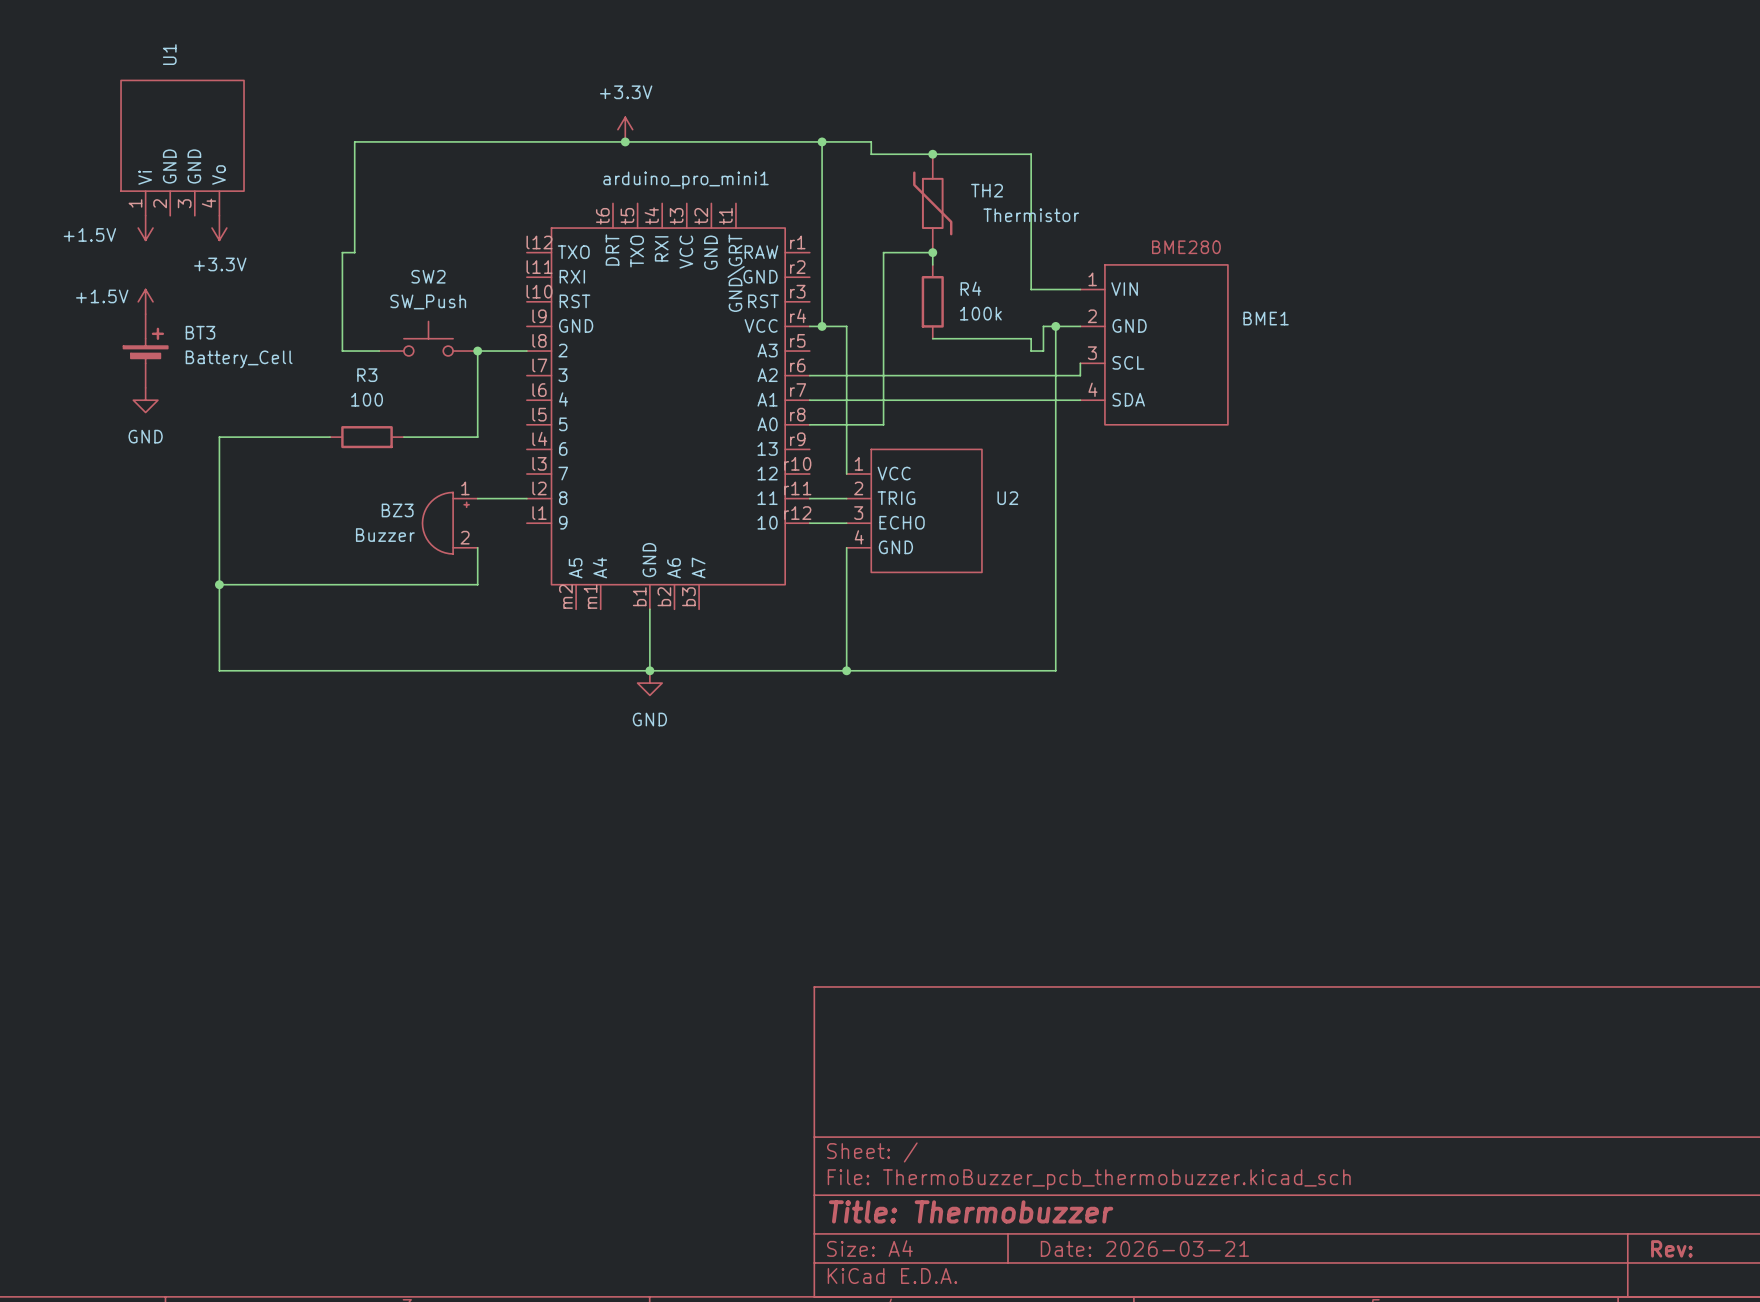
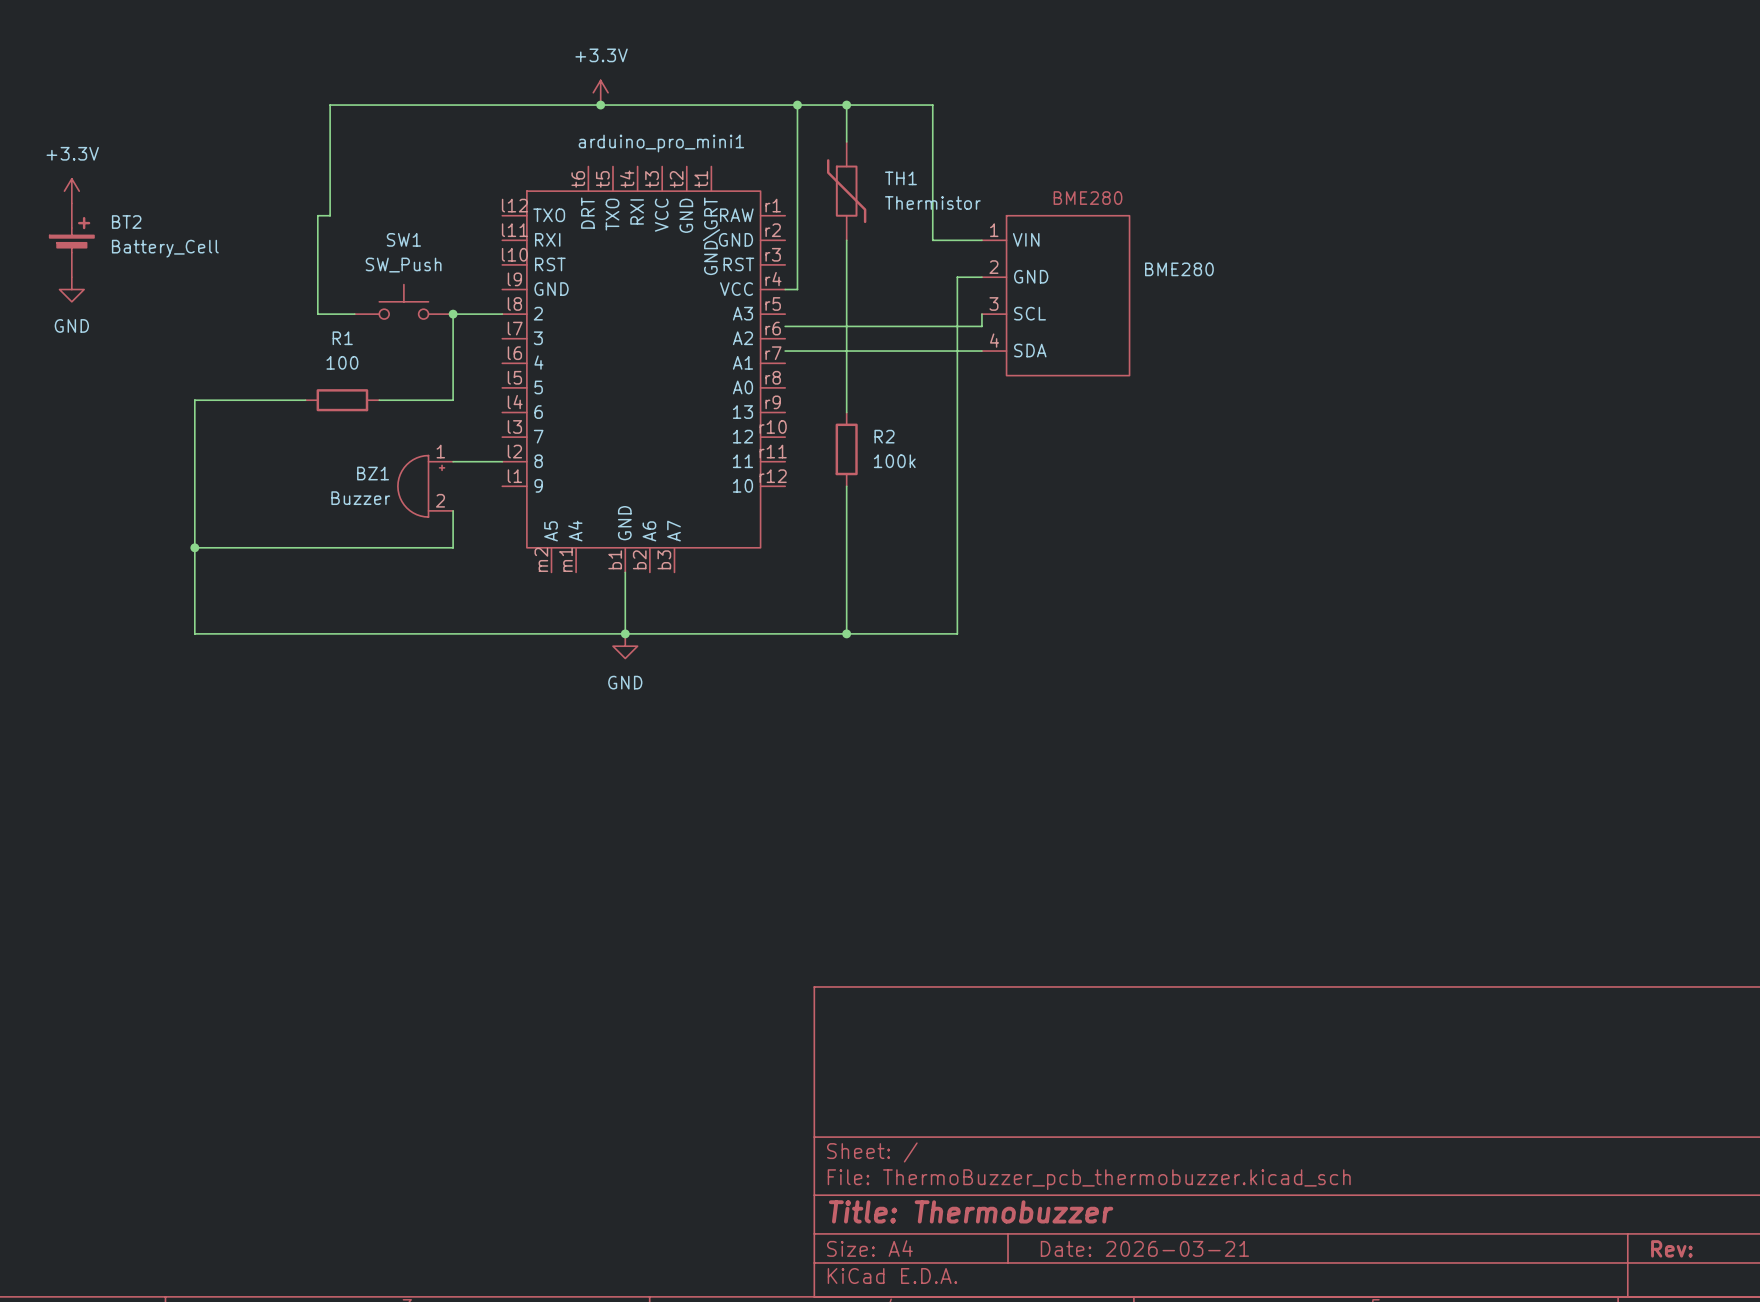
wire: none -> (797, 105) (797, 289) (785, 289)
junction: none -> (797, 105)
wire: none -> (846, 105) (846, 141)
junction: none -> (846, 105)
power symbol position: +3.3V (625, 129) -> +3.3V (600, 92)
junction position: (625, 141) -> (600, 105)
wire: (822, 141) (822, 326) -> none
junction: (822, 141) -> none
U1: (182, 148) -> none
junction: (932, 154) -> none
TH1: none -> Thermistor (846, 191)
TH2: Thermistor (932, 203) -> none
power symbol: +1.5V (145, 228) -> none
power symbol rotation: 0° (219, 228) -> 180° (71, 191)
power symbol position: +3.3V (219, 228) -> +3.3V (71, 191)
BT2: none -> Battery_Cell (71, 240)
wire: none -> (846, 240) (846, 326) (981, 326) (981, 314)
wire: none -> (981, 240) (932, 240) (932, 105) (330, 105) (330, 215) (317, 215) (317, 314) (354, 314)
junction: (932, 252) -> none
wire: (932, 264) (932, 252) (883, 252) (883, 424) (809, 424) -> none
wire: none -> (981, 277) (957, 277) (957, 633) (194, 633) (194, 400) (305, 400)
wire: (1080, 289) (1031, 289) (1031, 154) (871, 154) (871, 141) (354, 141) (354, 252) (342, 252) (342, 351) (379, 351) -> none
BME280: none -> (1055, 295)
power symbol: +1.5V (145, 301) -> none
SW1: none -> SW_Push (403, 301)
R4: 100k (932, 301) -> none
junction: (822, 326) -> none
wire: (1055, 326) (1055, 670) (219, 670) (219, 437) (330, 437) -> none
junction: (1055, 326) -> none
wire: (1080, 326) (1043, 326) (1043, 351) (1031, 351) (1031, 338) (932, 338) -> none
SW2: SW_Push (428, 338) -> none
BME1: (1154, 344) -> none
BT3: Battery_Cell (145, 351) -> none
junction position: (477, 351) -> (453, 314)
wire: (526, 351) (477, 351) (477, 437) (403, 437) -> (502, 314) (453, 314) (453, 400) (379, 400)
wire: none -> (785, 351) (981, 351)
wire: (1080, 363) (1080, 375) (809, 375) -> none
power symbol position: GND (145, 400) -> GND (71, 289)
R1: none -> 100 (342, 400)
wire: (809, 400) (1080, 400) -> none
arduino_pro_mini1 position: (668, 406) -> (643, 369)
wire: (846, 412) (846, 474) -> (846, 486) (846, 547)
R3: 100 (367, 437) -> none
R2: none -> 100k (846, 449)
BZ1: none -> Buzzer (425, 486)
wire: (477, 498) (526, 498) -> (453, 461) (502, 461)
wire: (809, 498) (846, 498) -> none
U2: (914, 510) -> none
BZ3: Buzzer (450, 523) -> none
wire: (809, 523) (846, 523) -> none
wire: (477, 547) (477, 584) (219, 584) -> (453, 510) (453, 547) (194, 547)
junction position: (219, 584) -> (194, 547)
wire: (649, 609) (649, 670) -> (625, 572) (625, 633)
wire: (846, 633) (846, 670) -> none
junction position: (649, 670) -> (625, 633)
junction position: (846, 670) -> (846, 633)
power symbol position: GND (649, 683) -> GND (625, 646)

